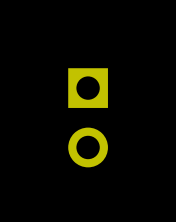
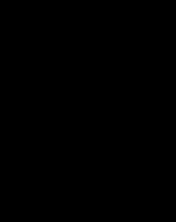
part: (88, 117) -> none

